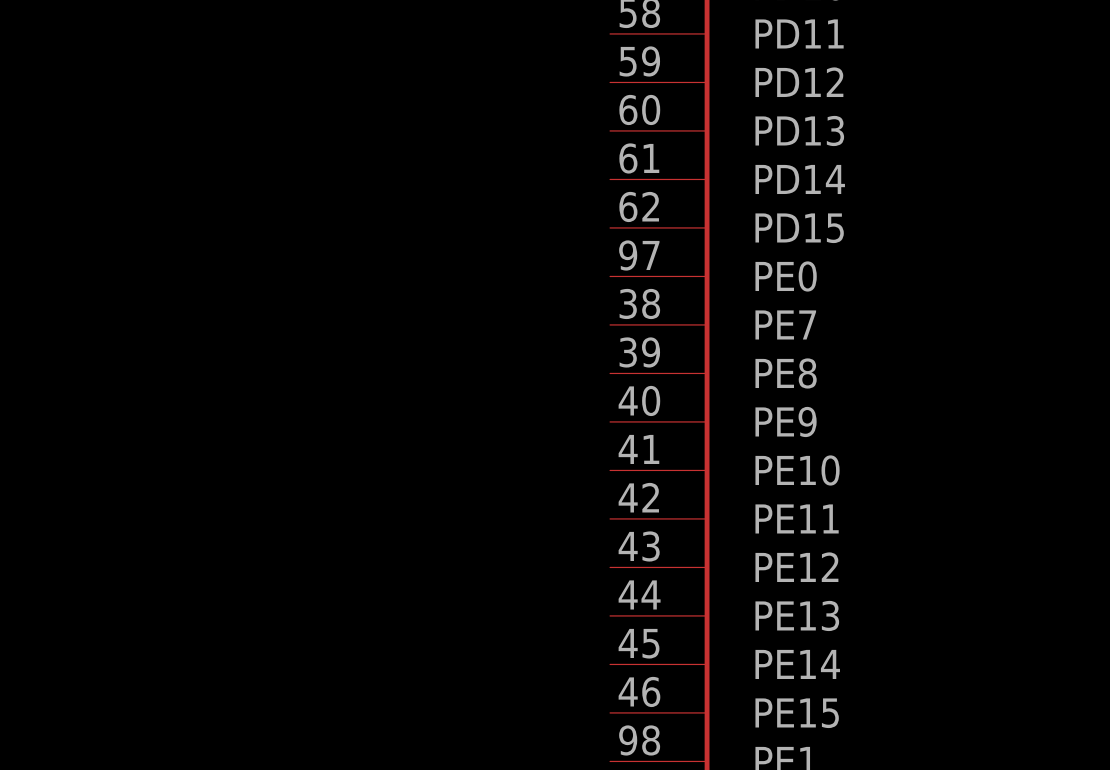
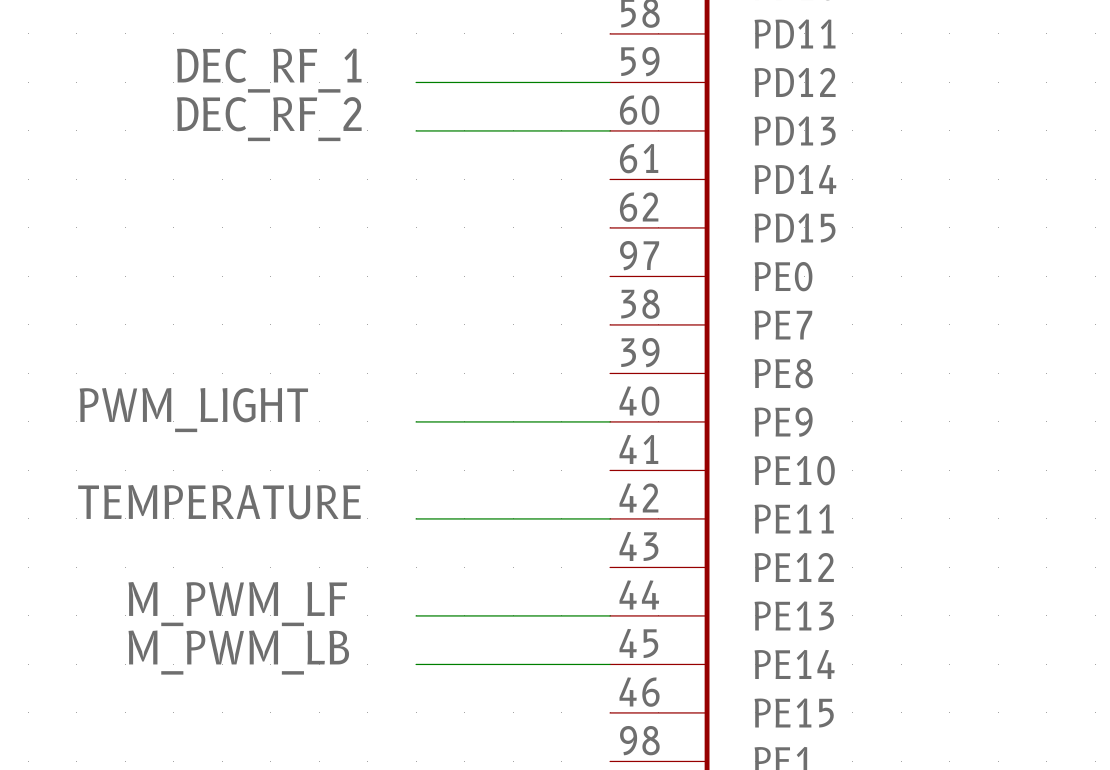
label: none -> DEC_RF_1 (269, 70)
wire: none -> (416, 82) (610, 82)
label: none -> DEC_RF_2 (269, 119)
wire: none -> (416, 130) (610, 130)
label: none -> PWM_LIGHT (193, 410)
wire: none -> (416, 421) (610, 421)
label: none -> TEMPERATURE (219, 502)
wire: none -> (416, 518) (610, 518)
label: none -> M_PWM_LF (237, 604)
wire: none -> (416, 615) (610, 615)
label: none -> M_PWM_LB (238, 652)
wire: none -> (416, 664) (610, 664)

